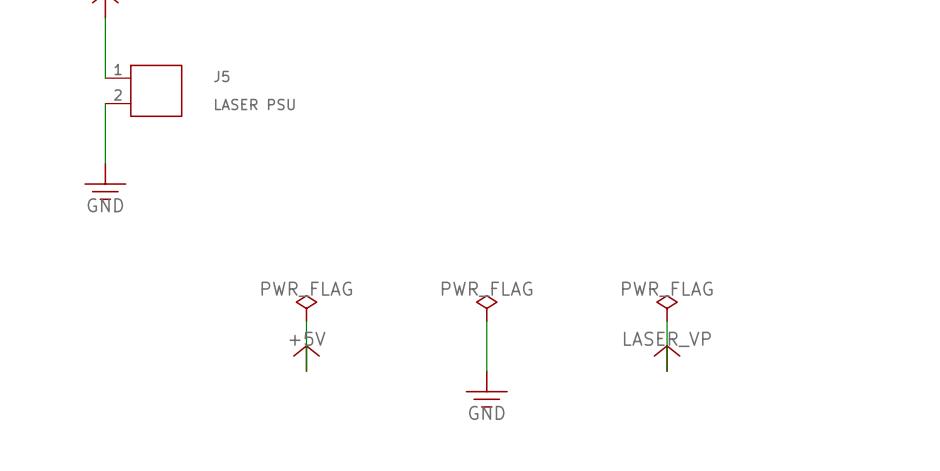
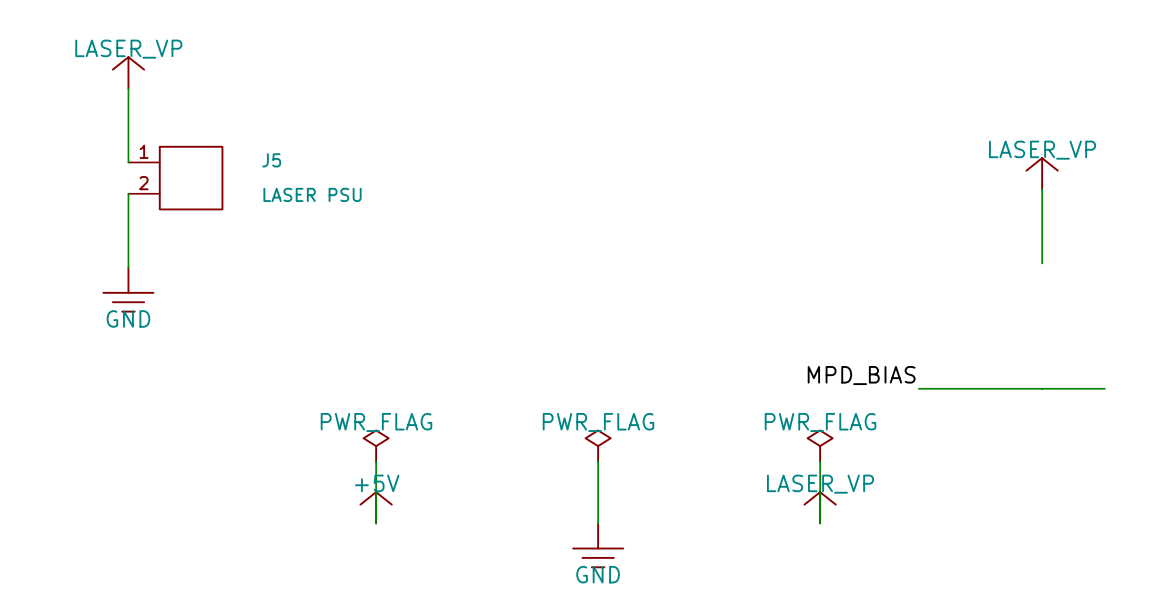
power symbol: none -> LASER_VP (1042, 173)
wire: none -> (1042, 189) (1042, 263)
label: none -> MPD_BIAS (861, 375)
wire: none -> (918, 388) (1104, 388)

